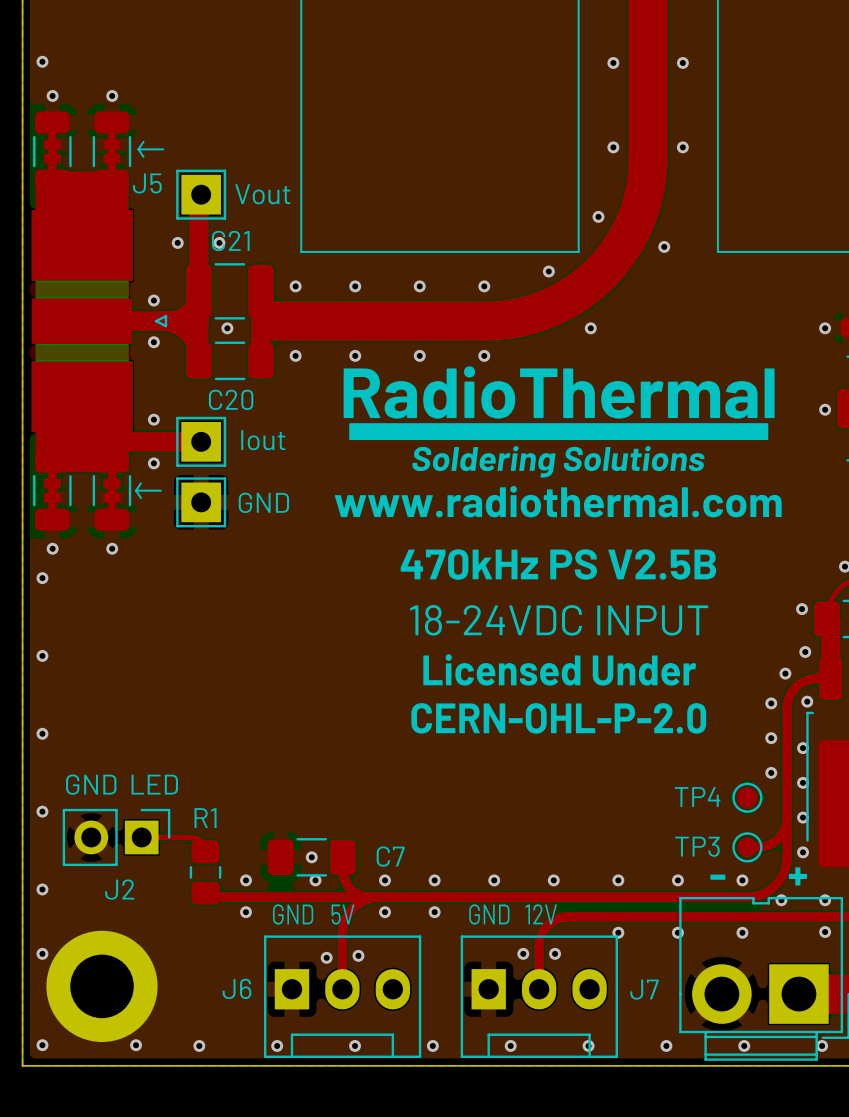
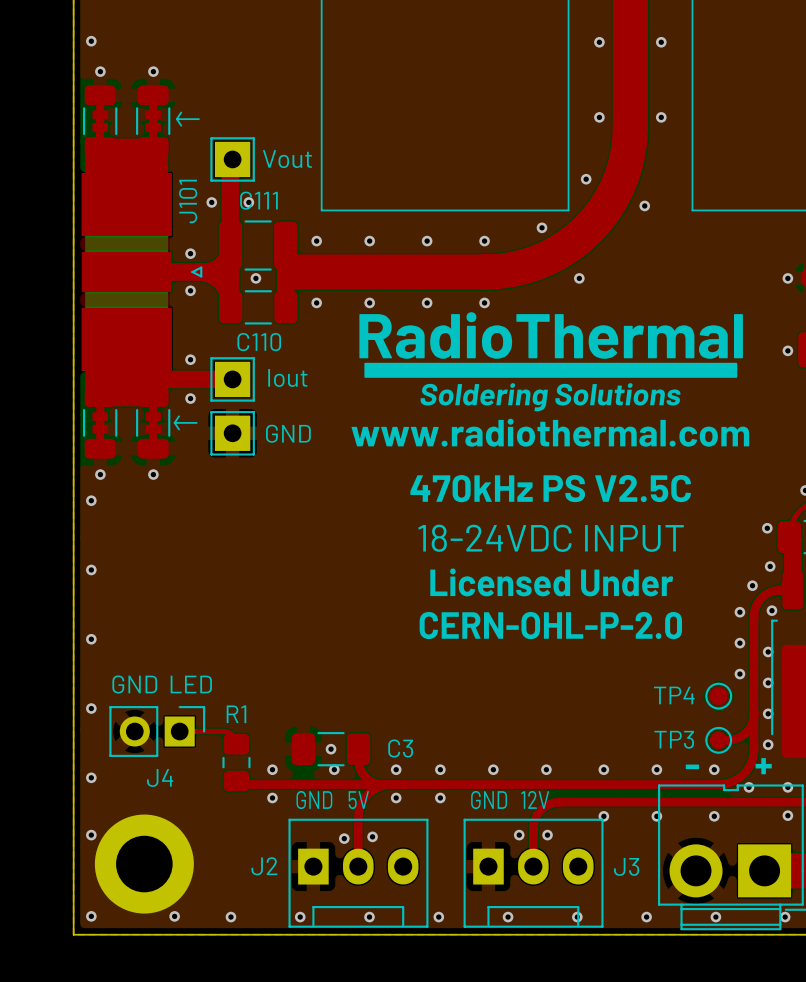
J5 name: J5 (147, 183) -> J101 (188, 201)
C21 name: C21 (230, 240) -> C111 (258, 200)
C20 name: C20 (231, 399) -> C110 (259, 342)
text: 470kHz PS V2.5B (558, 564) -> 470kHz PS V2.5C (550, 488)
C7 name: C7 (390, 856) -> C3 (400, 748)
J2 name: J2 (119, 889) -> J4 (160, 777)
J6 name: J6 (237, 988) -> J2 (264, 866)
J7 name: J7 (644, 989) -> J3 (626, 866)

